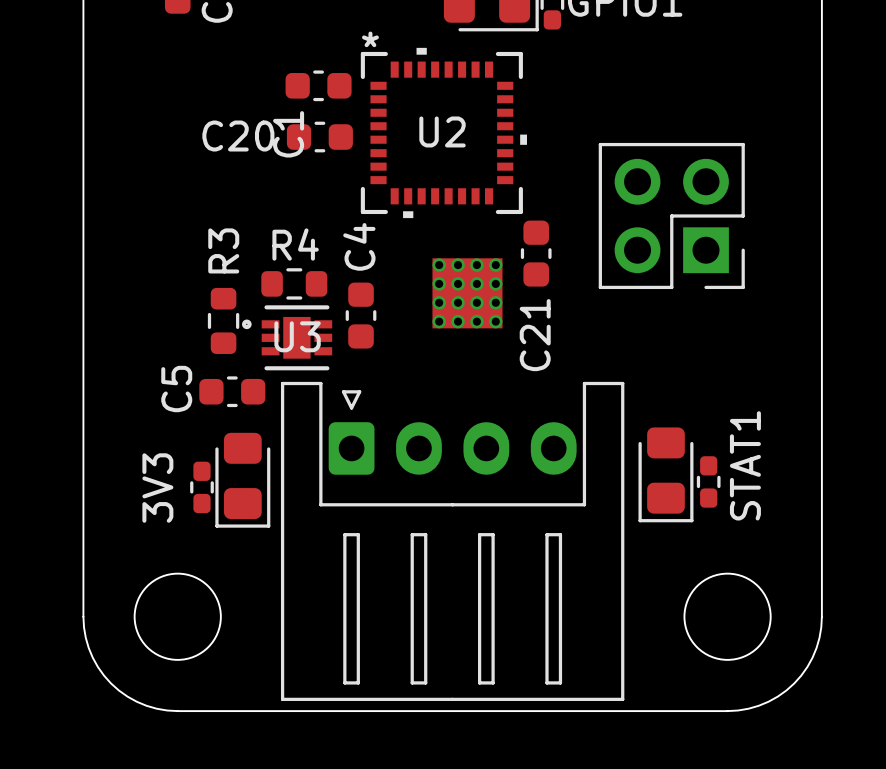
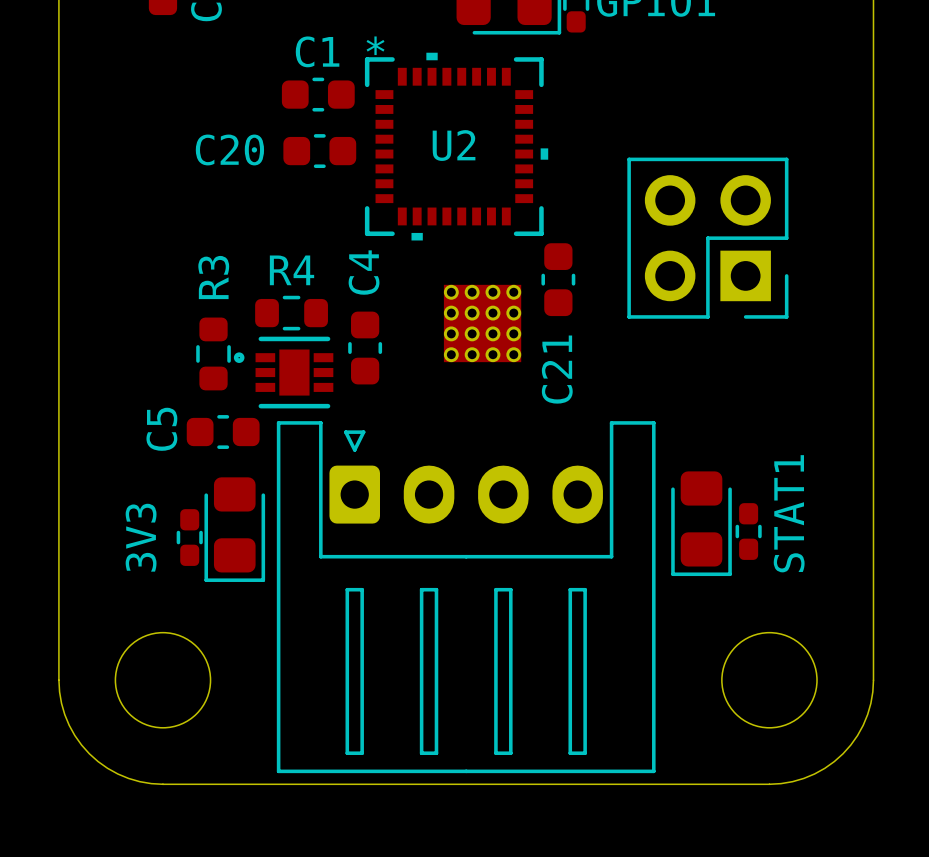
C1 name rotation: 0° (288, 134) -> 90° clockwise (317, 51)
C1 name position: C1 (288, 134) -> C1 (317, 51)
U3 name: U3 (297, 336) -> none

